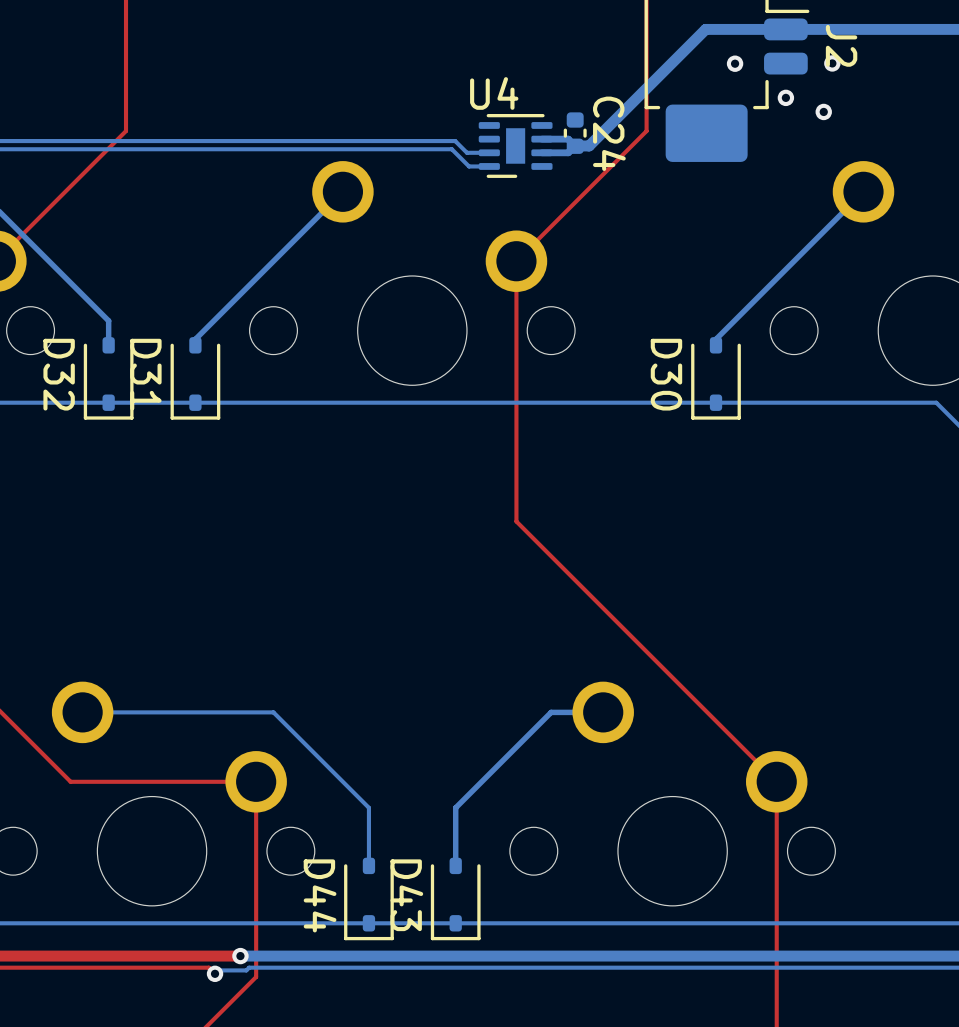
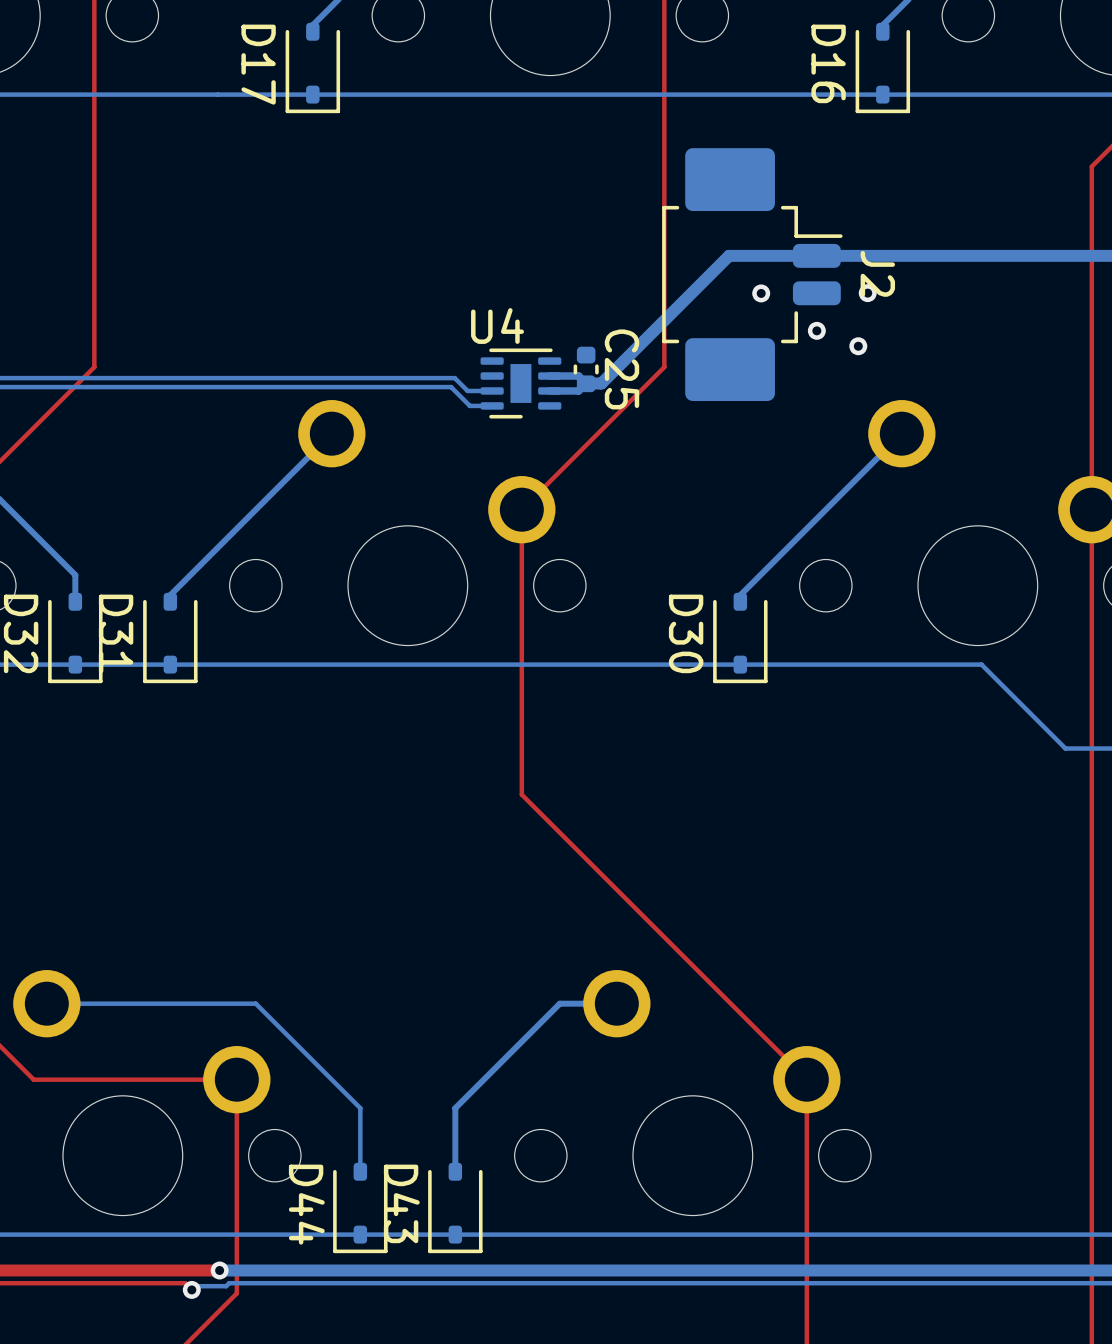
C24 name: C24 (609, 133) -> C25 (621, 369)

